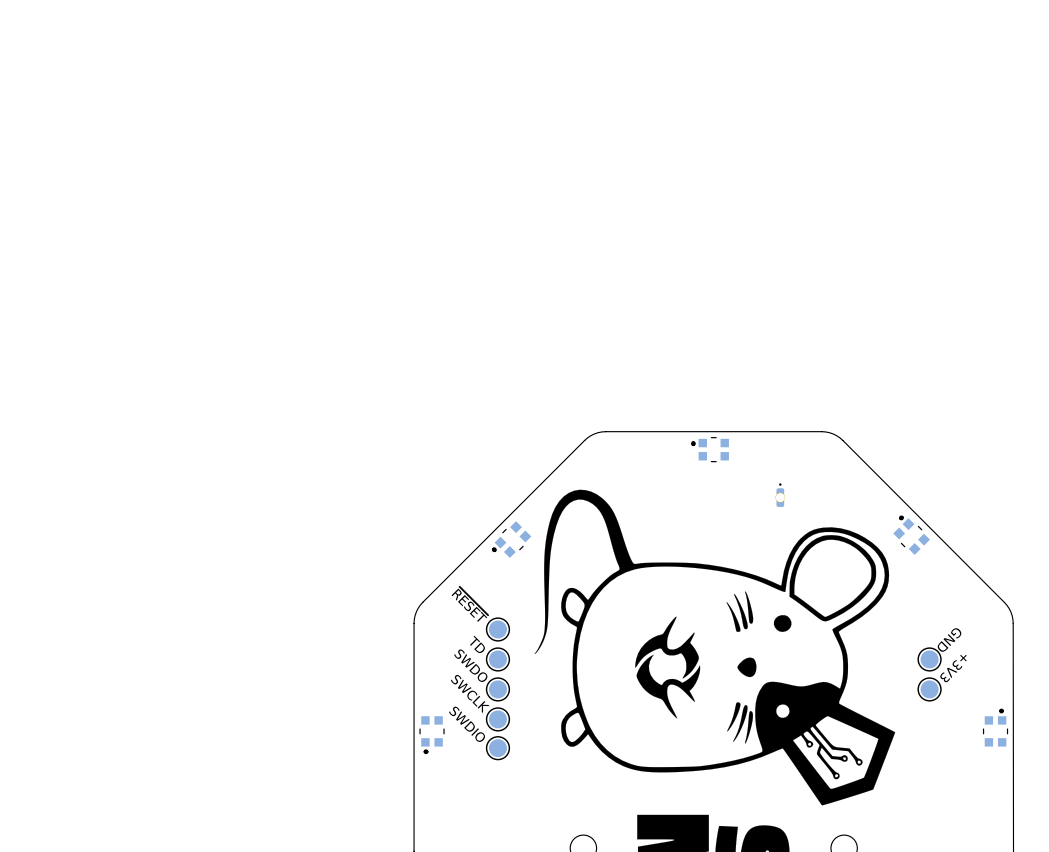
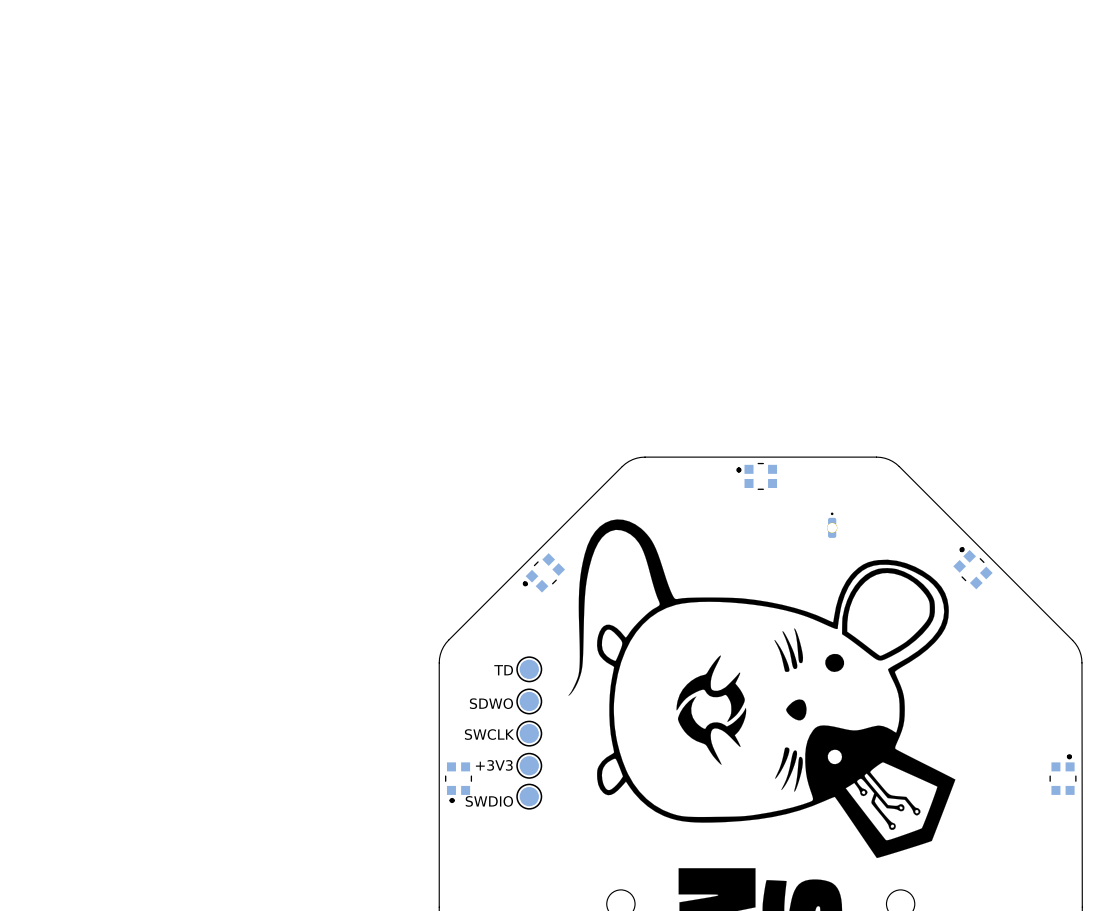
text: ~{RESET} (469, 604) -> TD (503, 670)
text: GND (949, 640) -> none
text: TD (477, 644) -> none
part: (929, 659) -> none
text: SWDO (470, 665) -> SDWO (491, 703)
text: +3V3 (953, 668) -> none
part: (929, 689) -> none
text rotation: 0° (470, 693) -> 45° counterclockwise (489, 734)
text: none -> +3V3 (494, 765)
text rotation: 0° (467, 724) -> 45° counterclockwise (489, 801)

